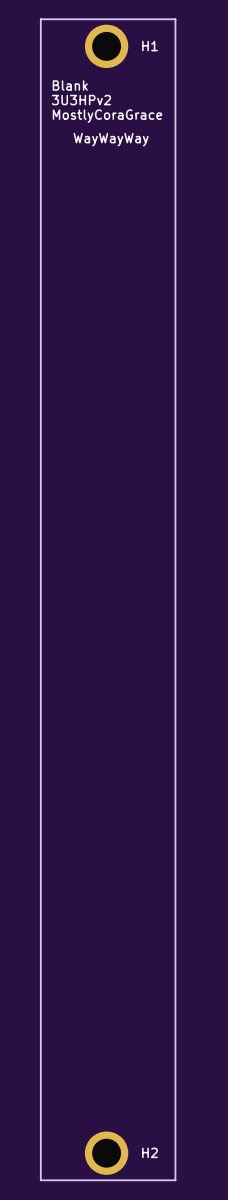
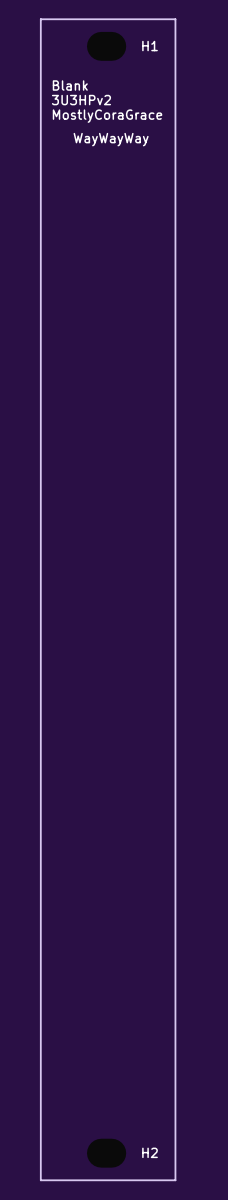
H1 footprint: [84, 24, 129, 69] -> [86, 31, 127, 61]
H2 footprint: [84, 1131, 129, 1175] -> [86, 1138, 127, 1168]

